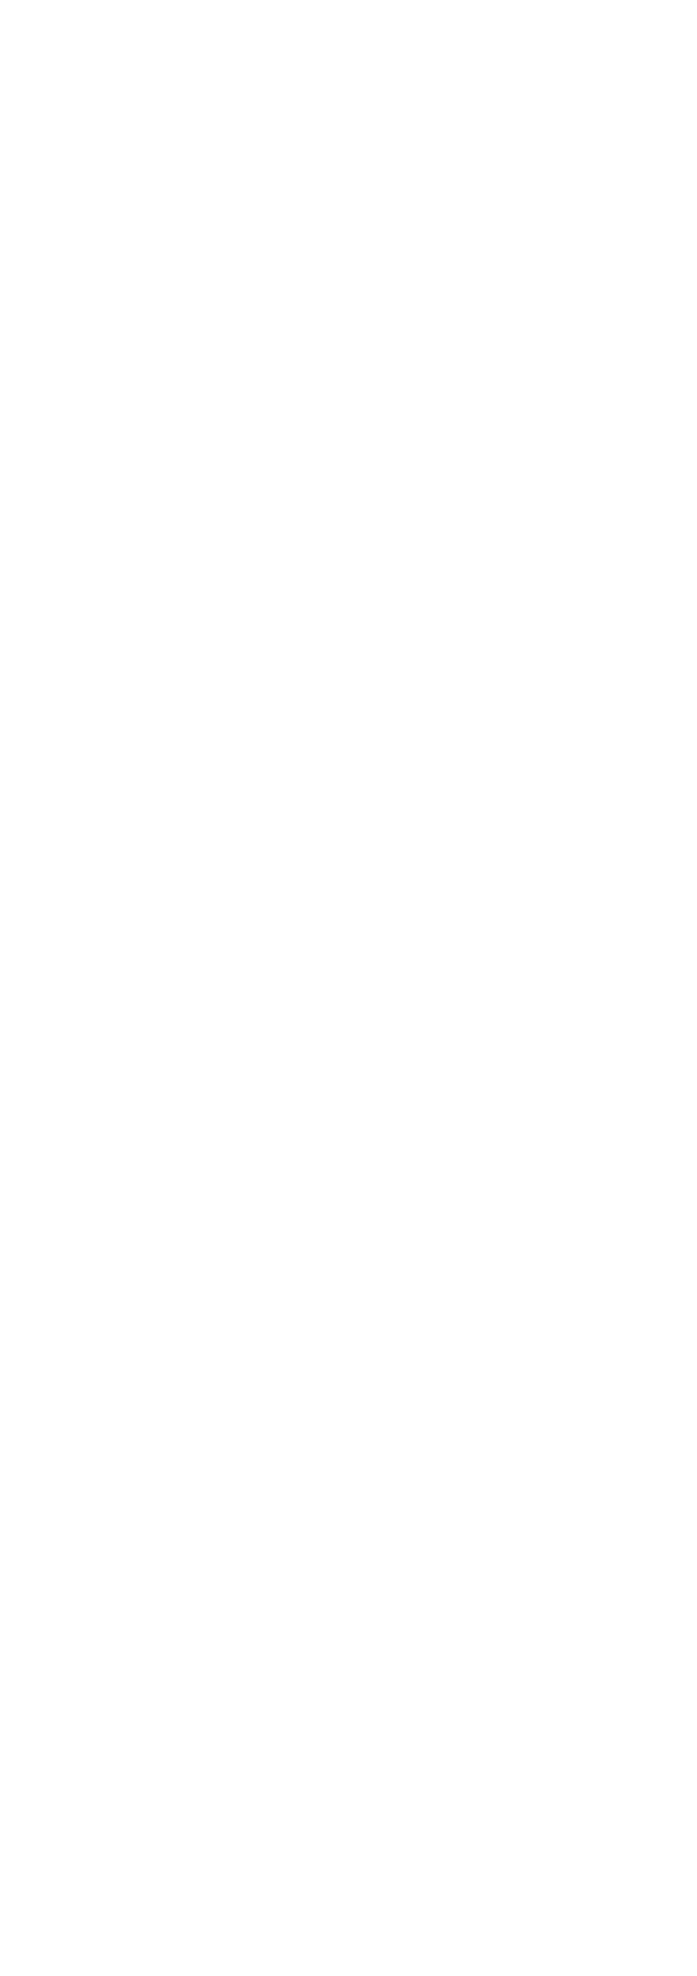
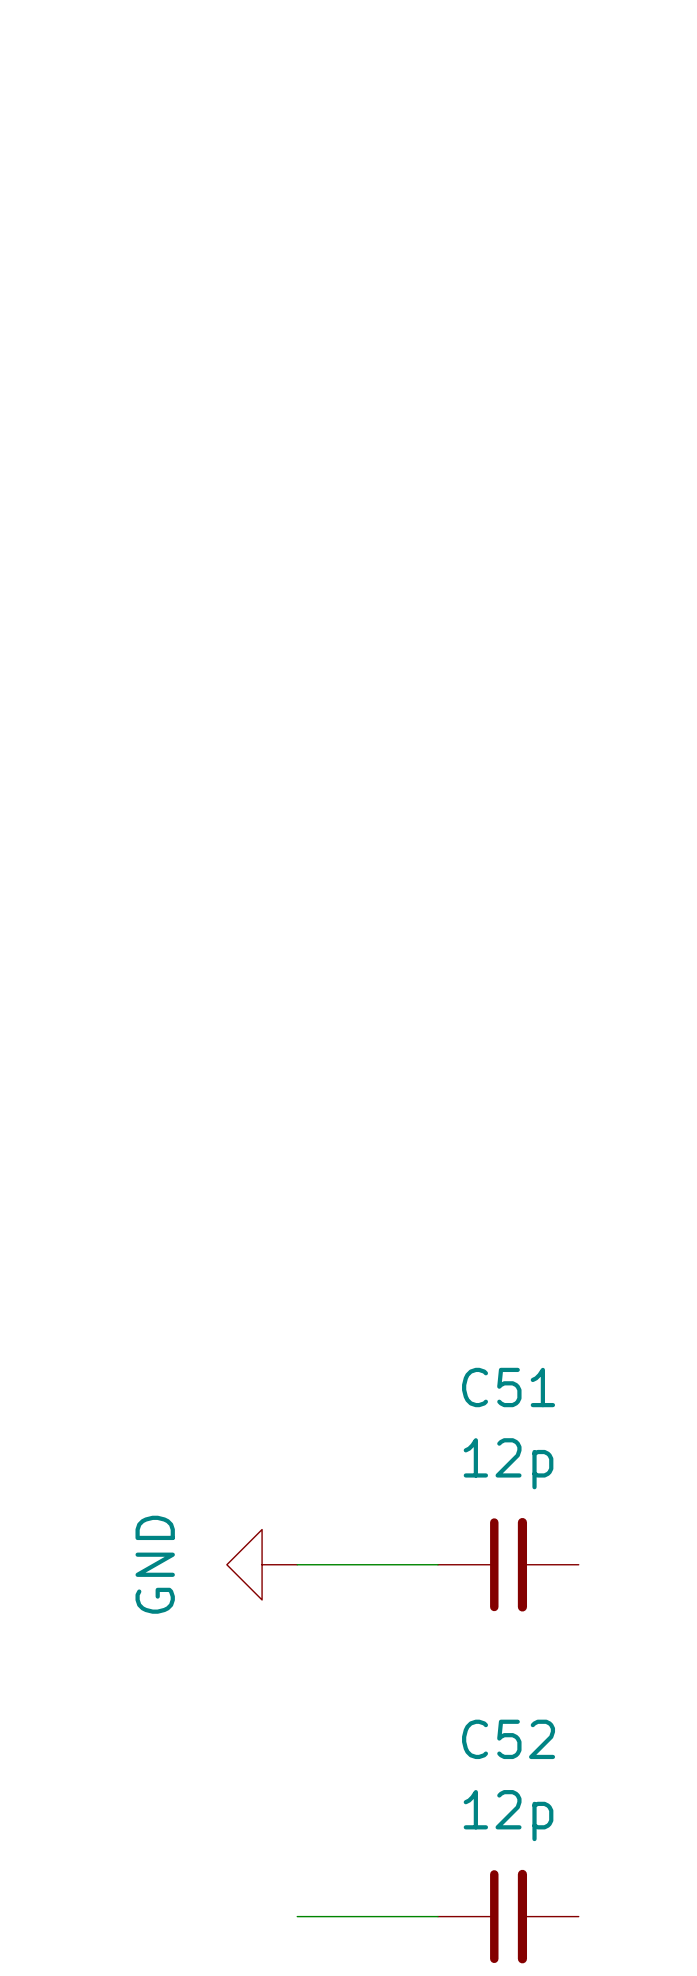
power symbol: none -> GND (262, 1564)
wire: none -> (297, 1564) (437, 1564)
C51: none -> 12p (508, 1564)
wire: none -> (297, 1916) (437, 1916)
C52: none -> 12p (508, 1916)

